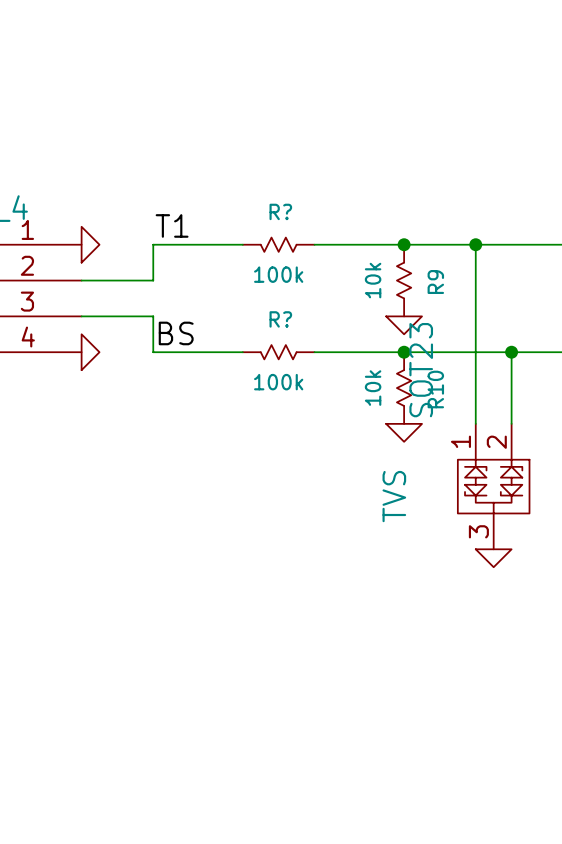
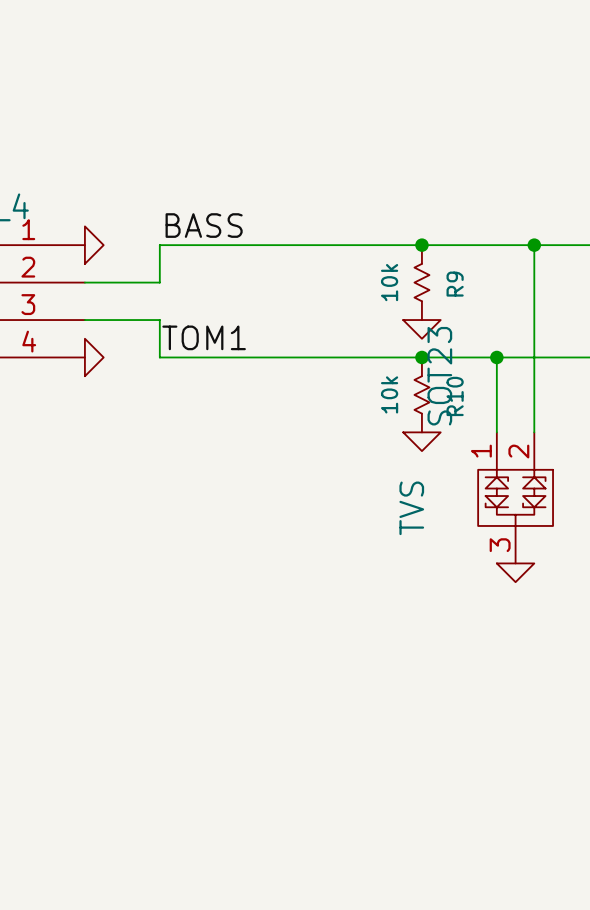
label: T1 (172, 225) -> BASS (204, 225)
R?: 100k (278, 244) -> none
wire: (475, 244) (475, 352) -> (534, 245) (534, 357)
junction position: (475, 244) -> (534, 245)
label: BS (176, 333) -> TOM1 (204, 337)
R?: 100k (278, 352) -> none
junction position: (511, 352) -> (496, 357)

